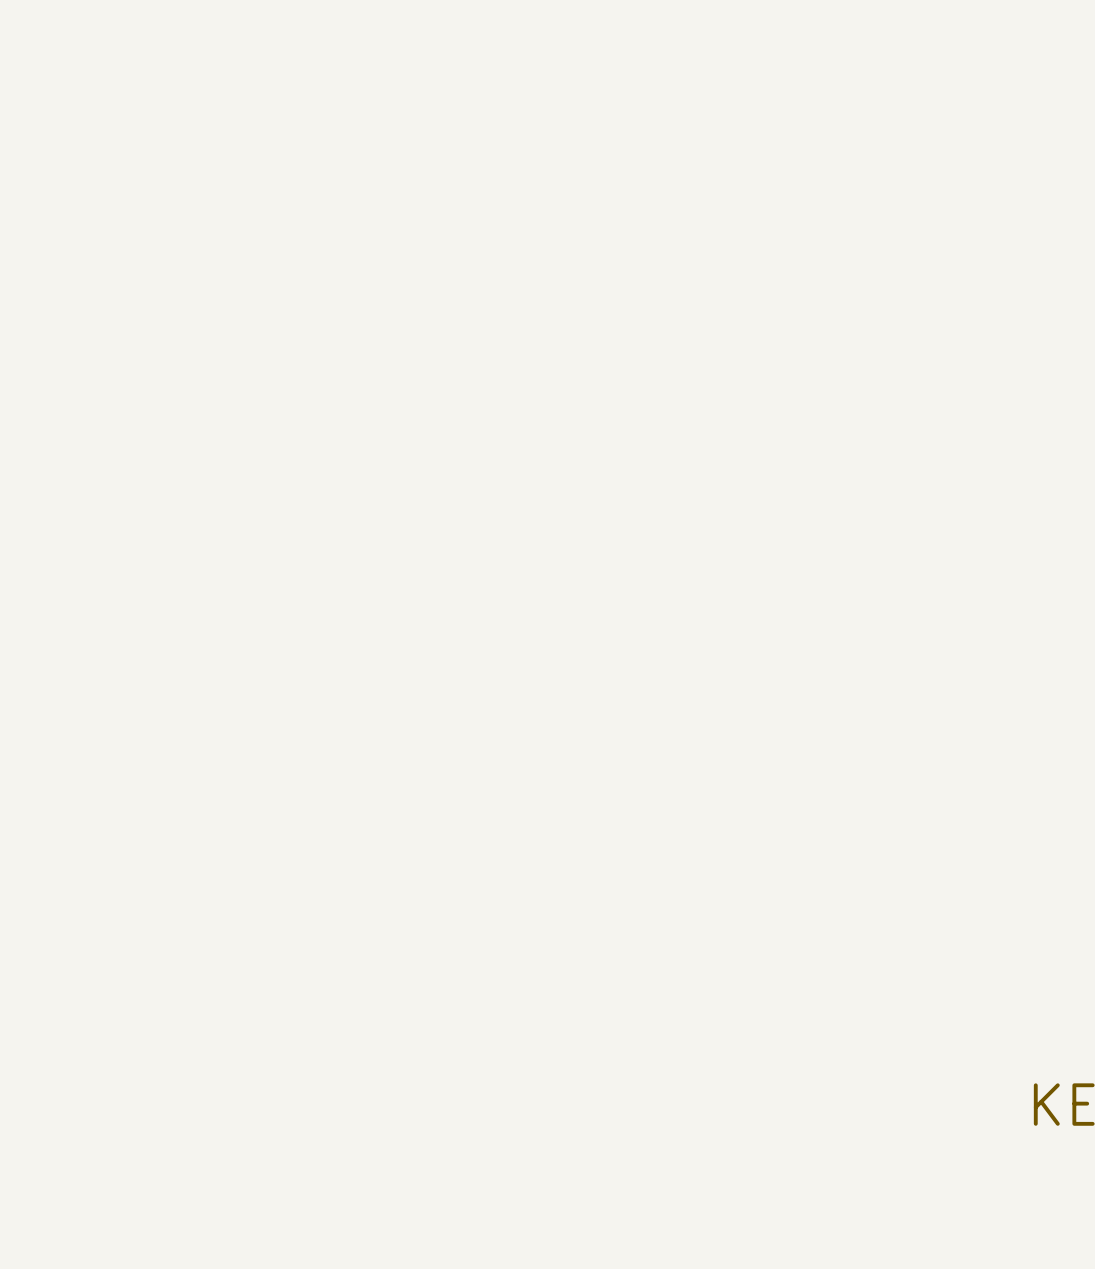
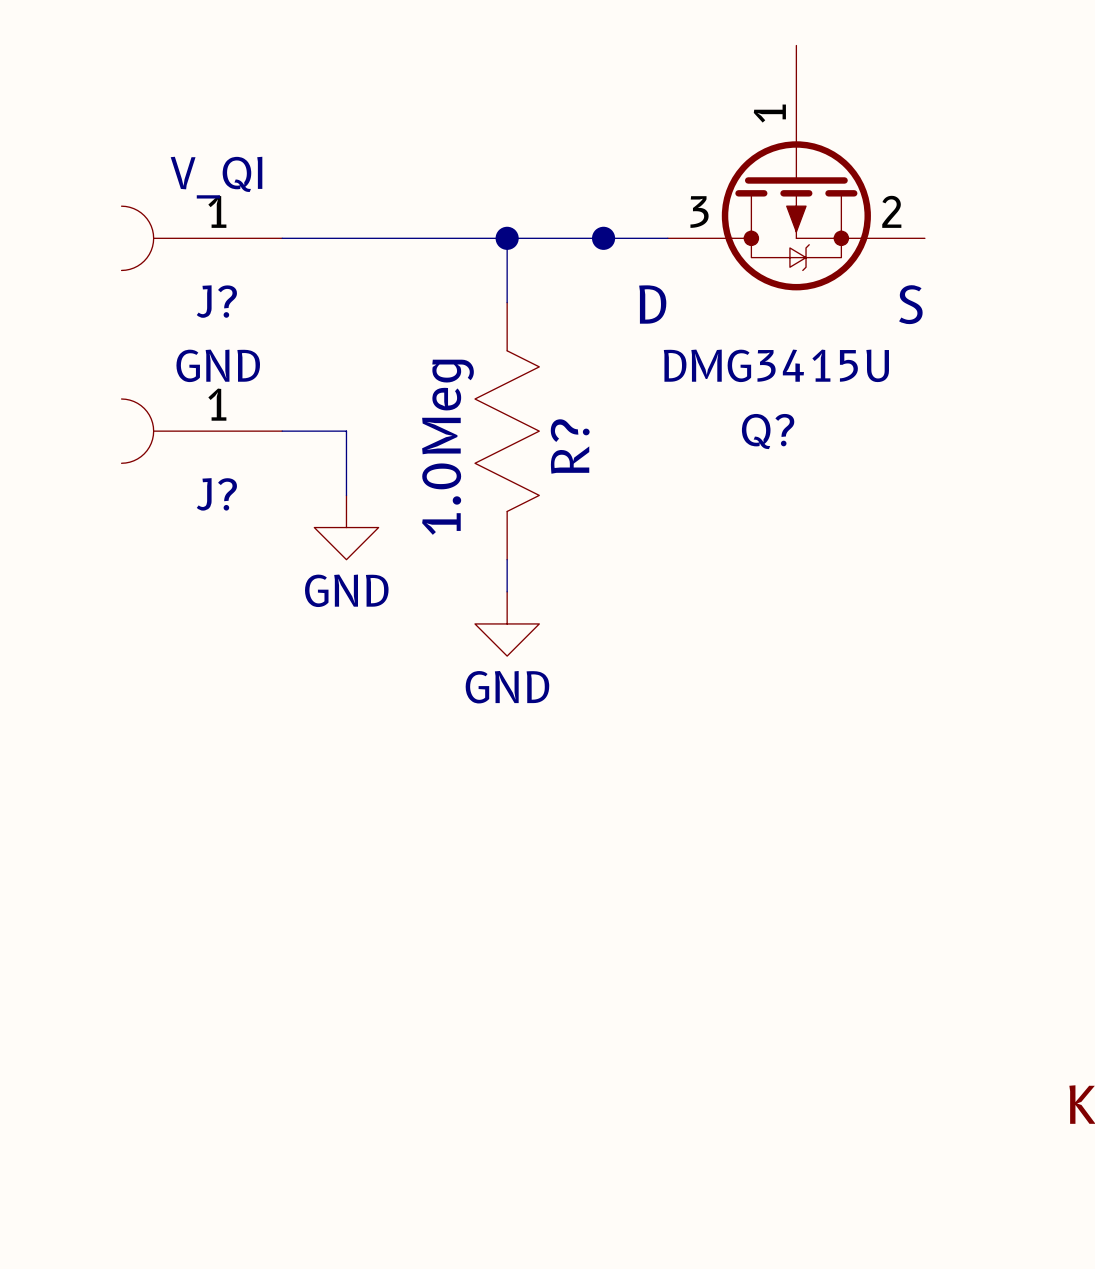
Q?: none -> DMG3415U (796, 167)
J?: none -> V_QI (201, 238)
wire: none -> (282, 238) (667, 238)
wire: none -> (507, 238) (507, 302)
junction: none -> (507, 238)
junction: none -> (603, 238)
text: none -> D (652, 304)
text: none -> S (910, 304)
J?: none -> GND (201, 431)
wire: none -> (282, 431) (346, 431) (346, 495)
R?: none -> 1.0Meg (507, 431)
power symbol: none -> GND (346, 527)
wire: none -> (507, 559) (507, 591)
power symbol: none -> GND (507, 623)

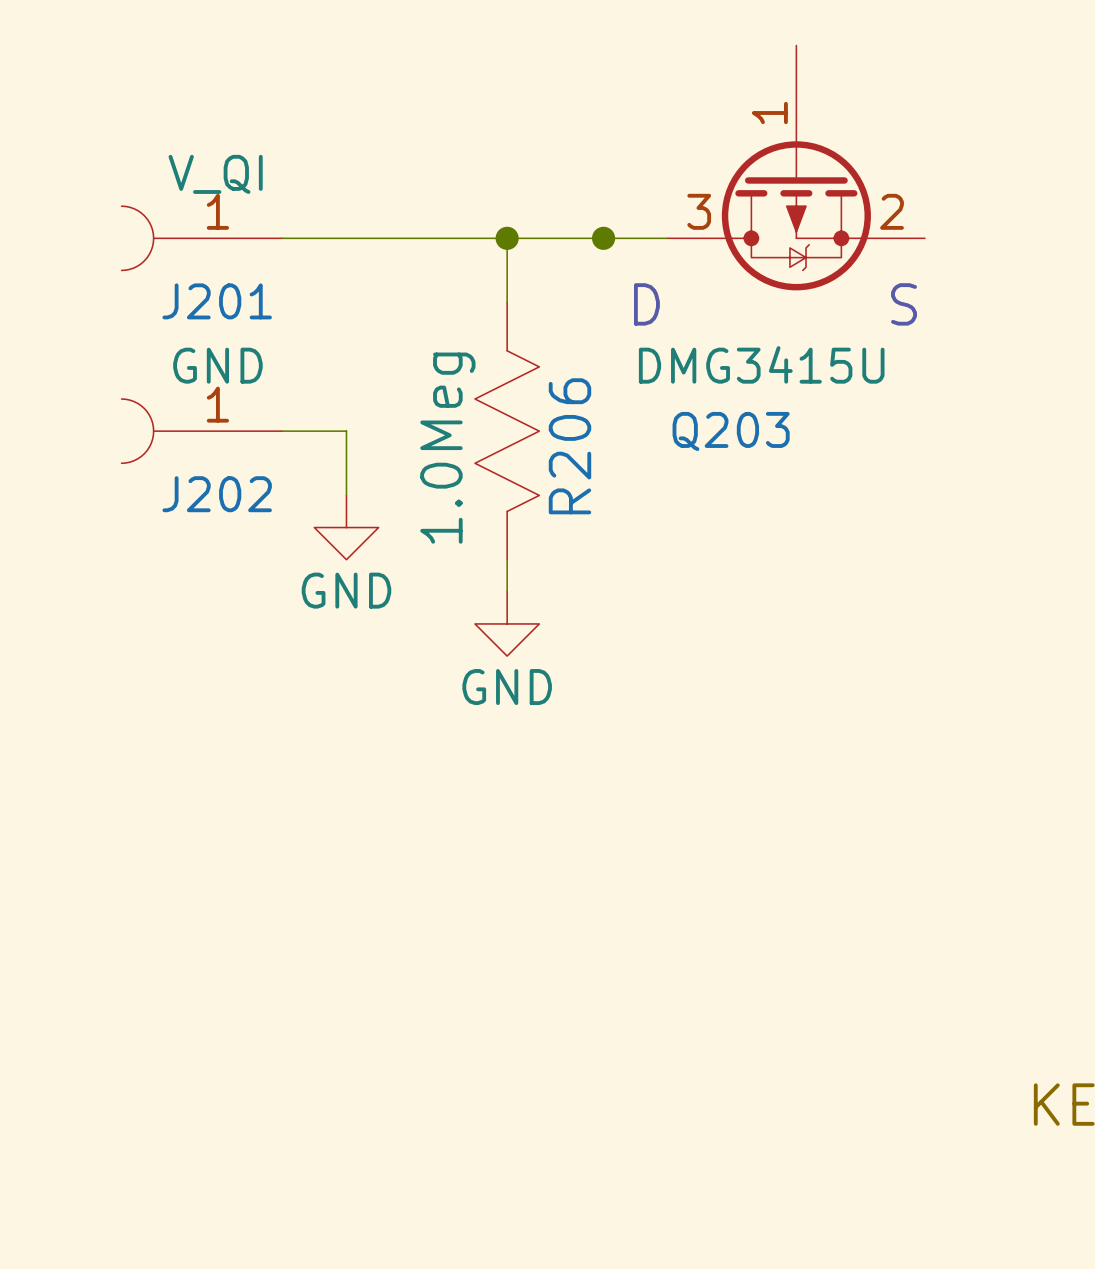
J? name: J? (216, 301) -> J201 (217, 301)
Q? name: Q? (768, 431) -> Q203 (731, 431)
R? name: R? (570, 446) -> R206 (569, 446)
J? name: J? (216, 494) -> J202 (217, 494)

